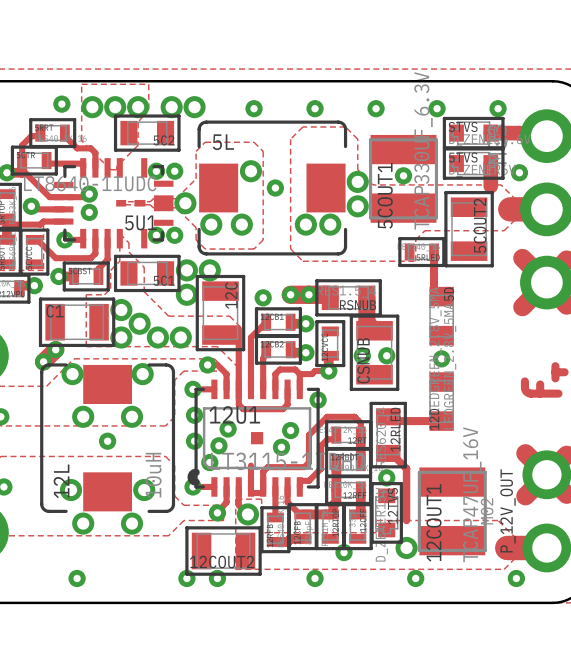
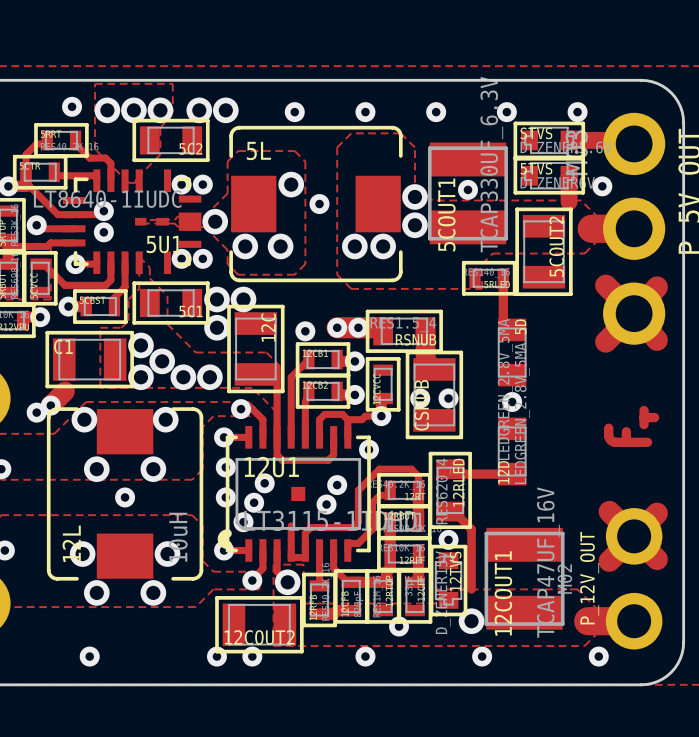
via position: (55, 349) -> (36, 412)

